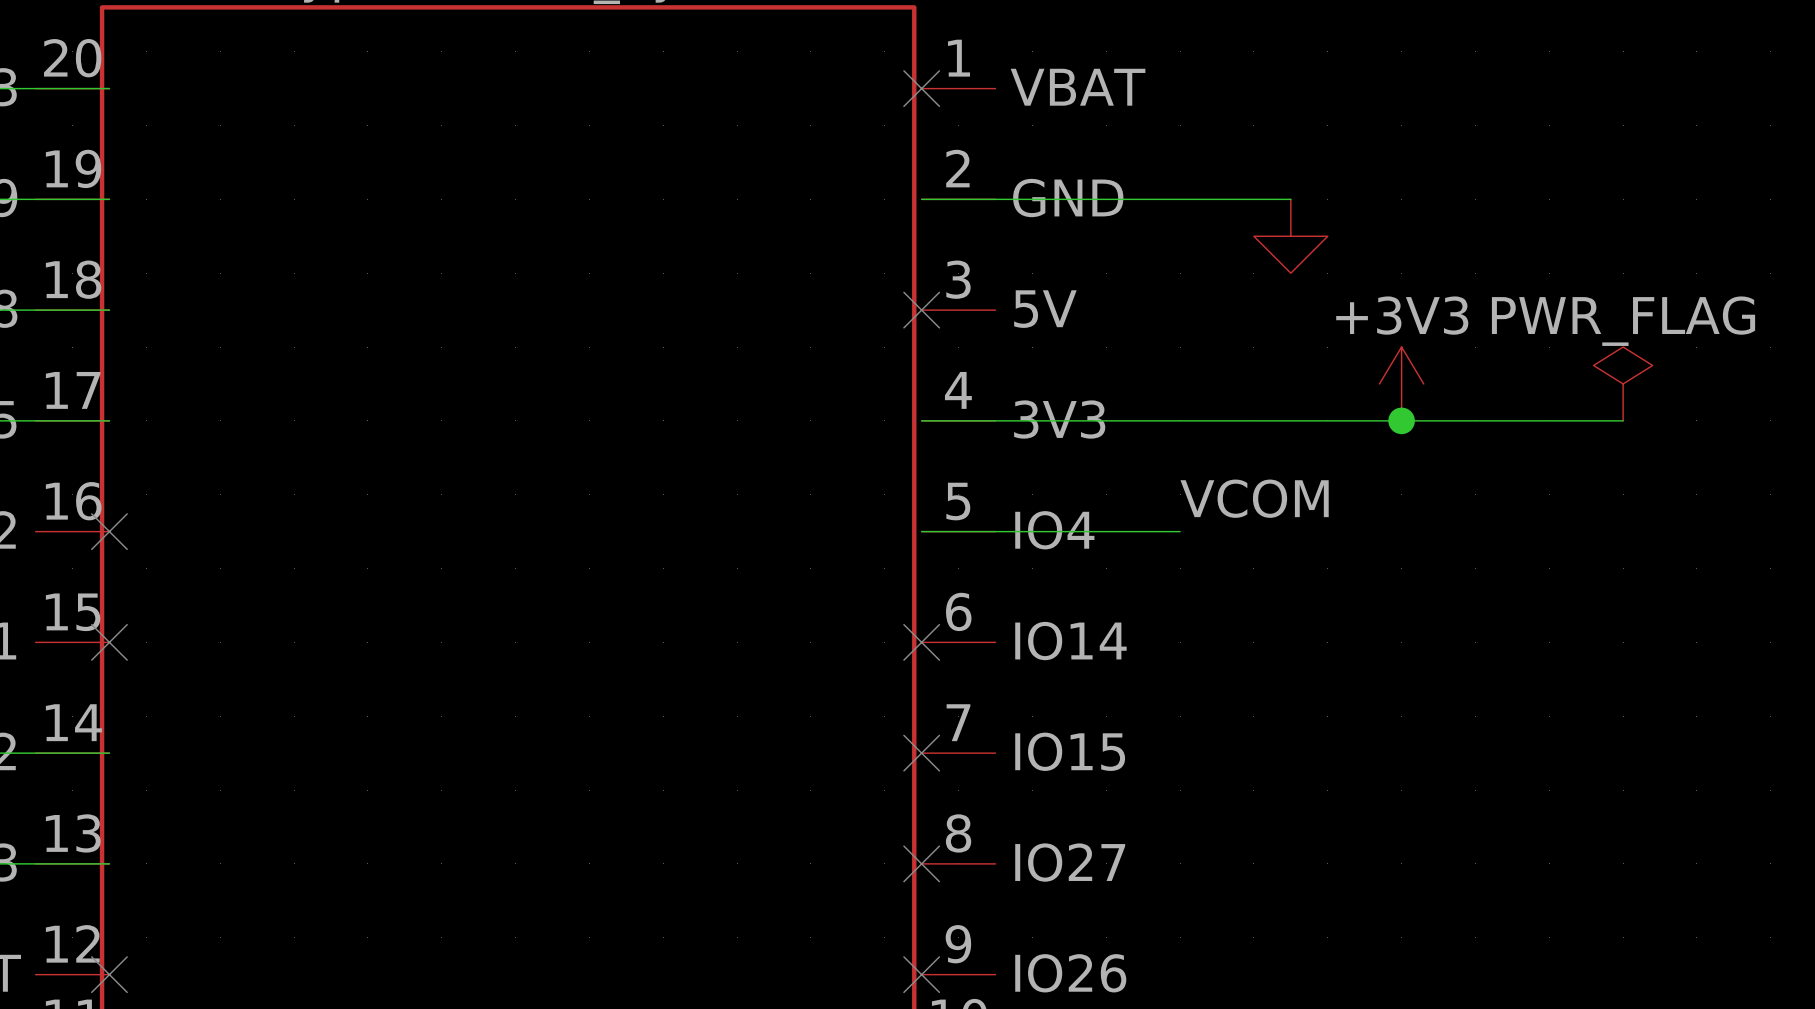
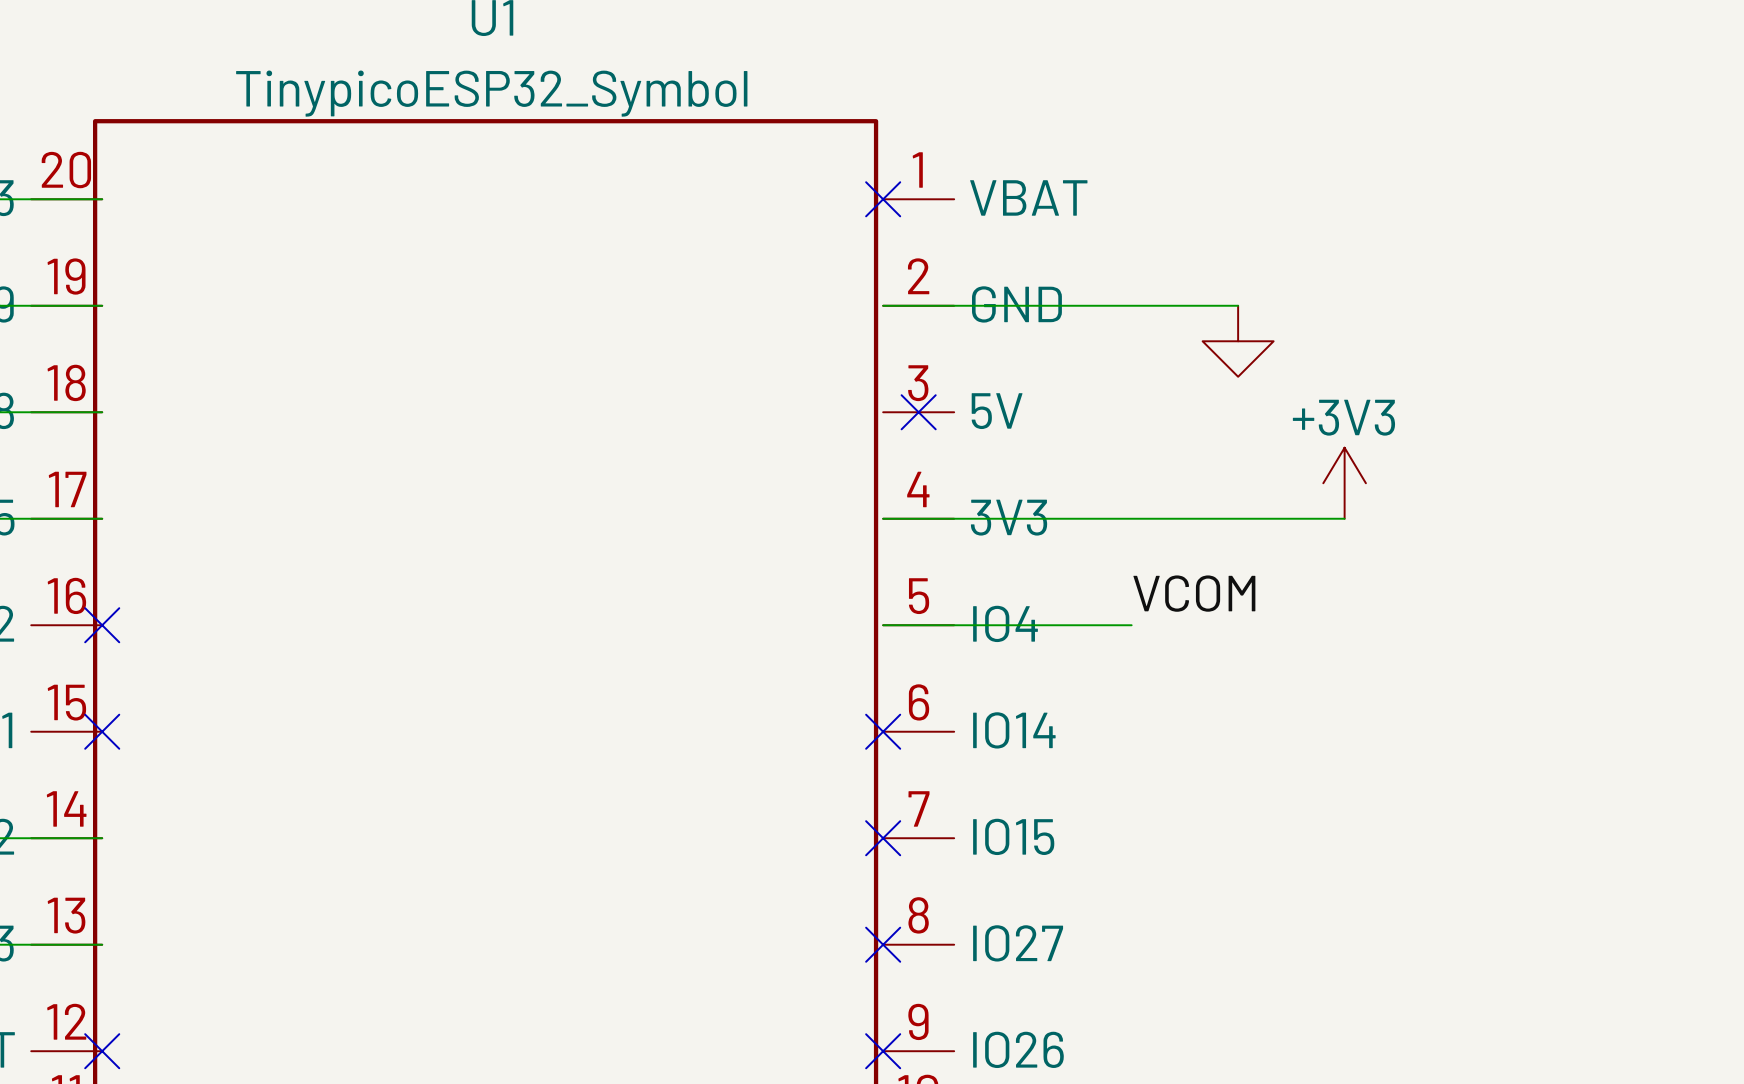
no-connect mark position: (921, 310) -> (918, 412)
power symbol: PWR_FLAG (1623, 383) -> none
wire: (1401, 420) (1623, 420) -> none
junction: (1401, 420) -> none

